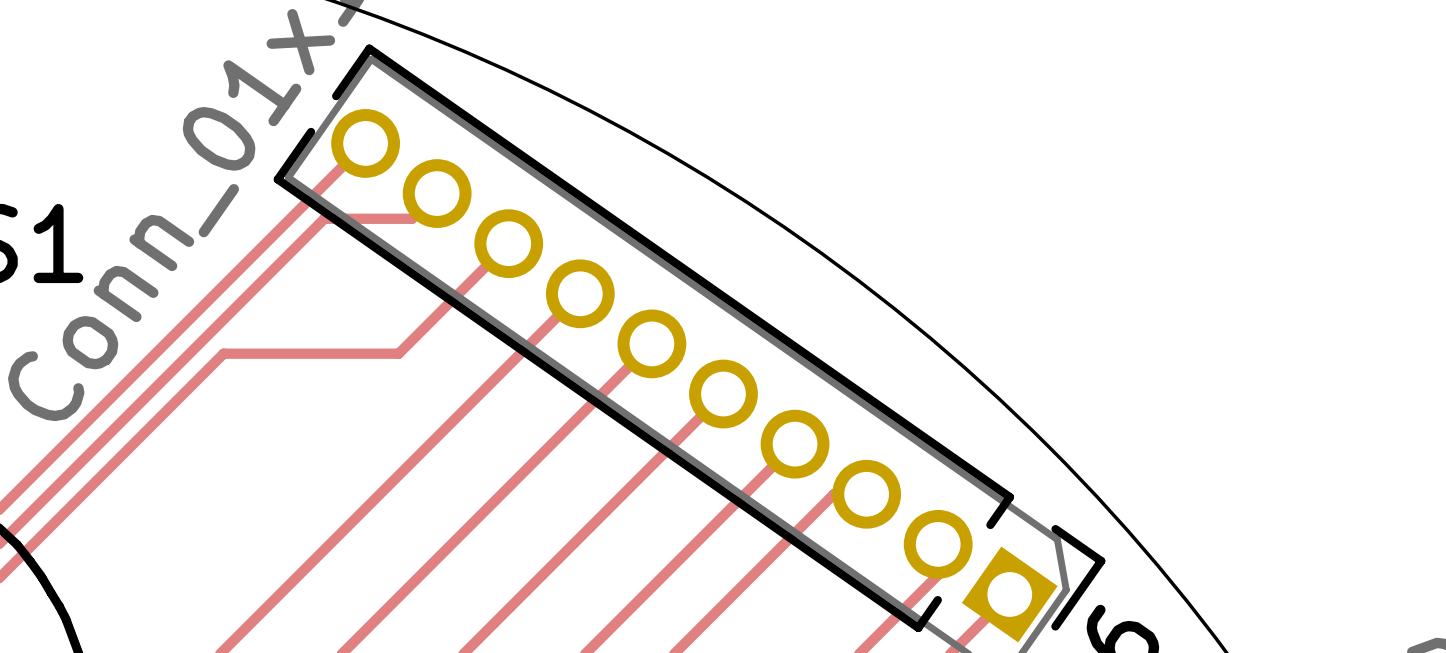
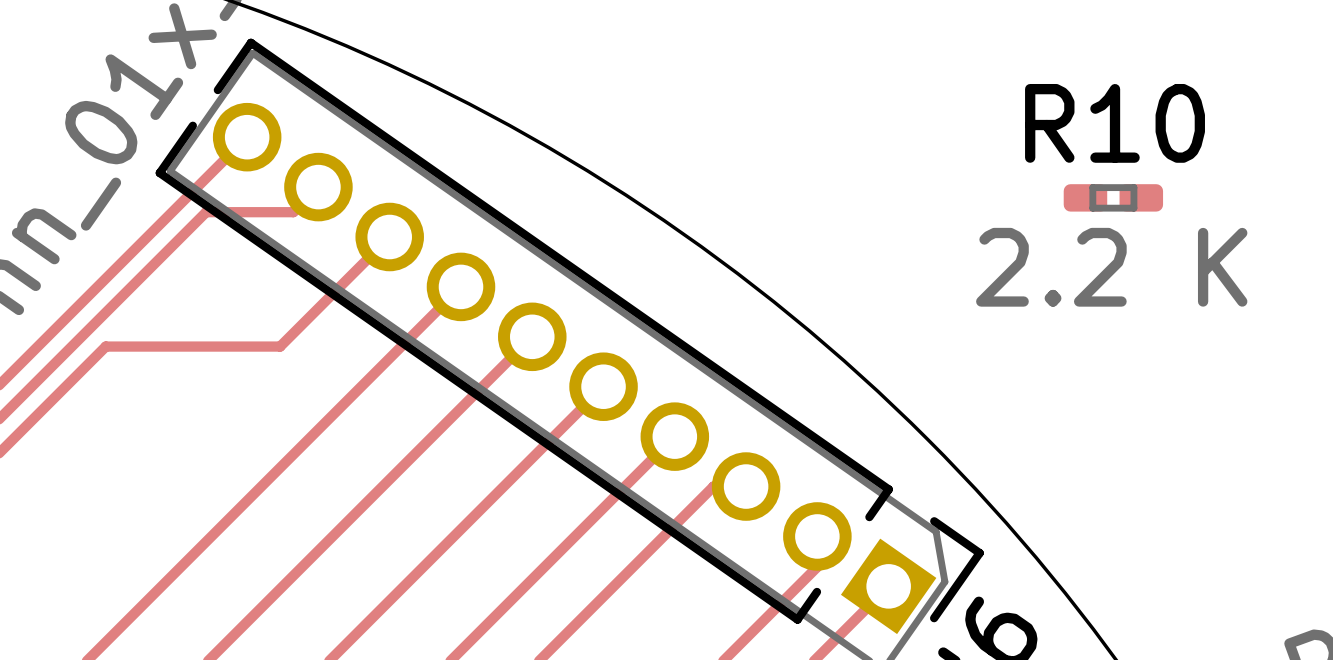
R10: none -> 2.2 K (1113, 197)

